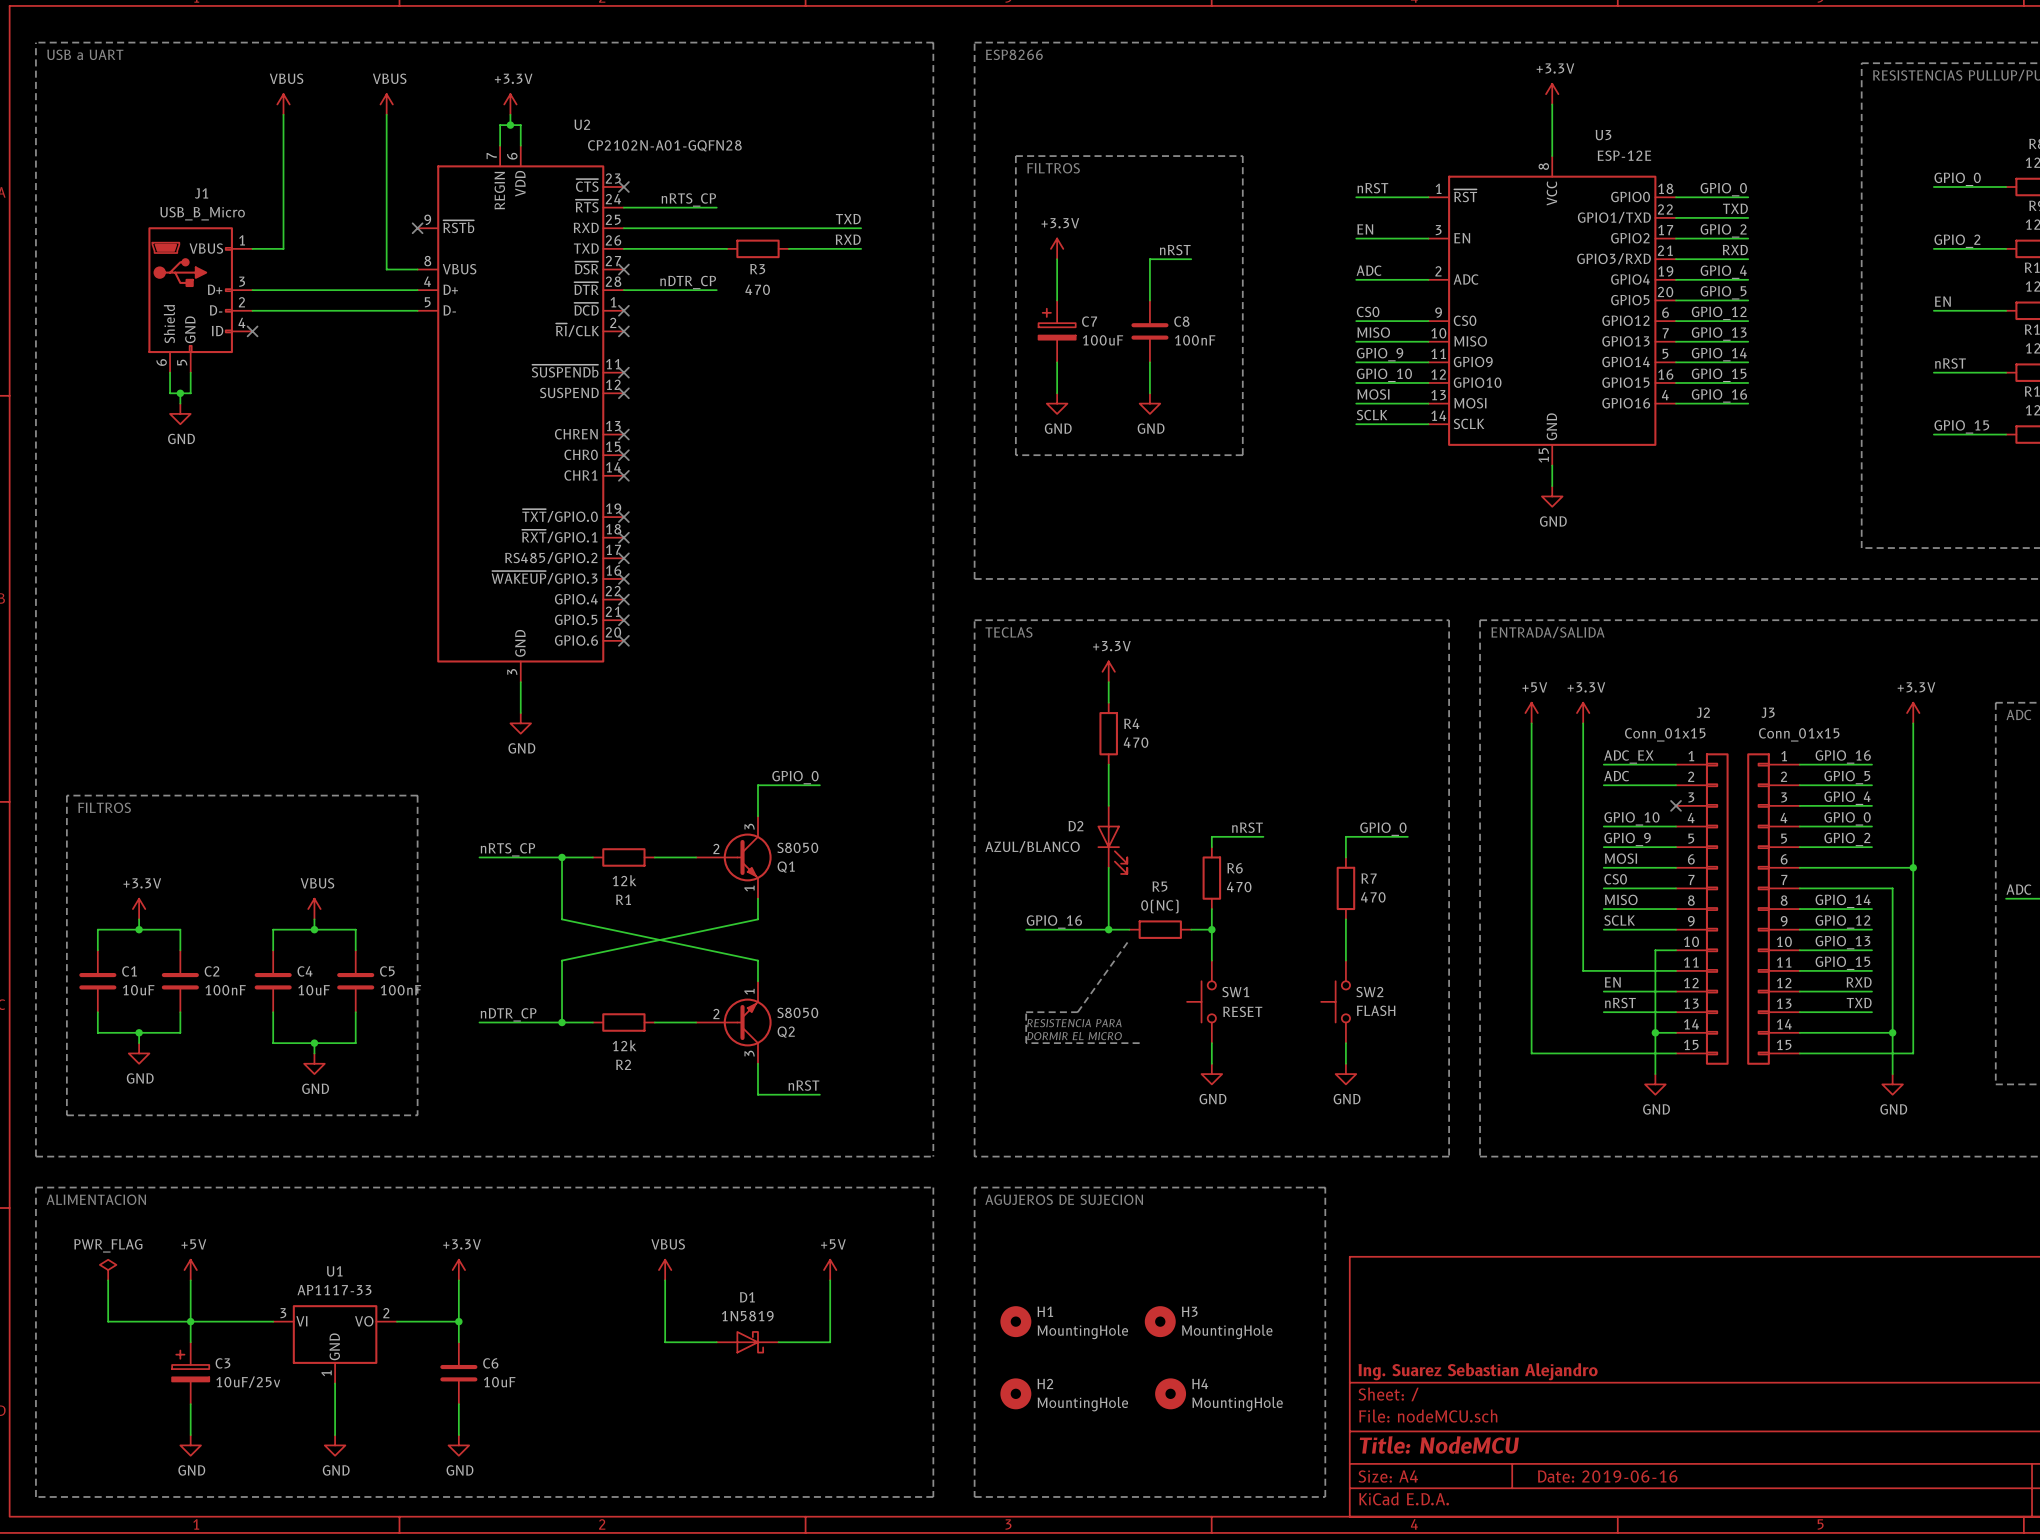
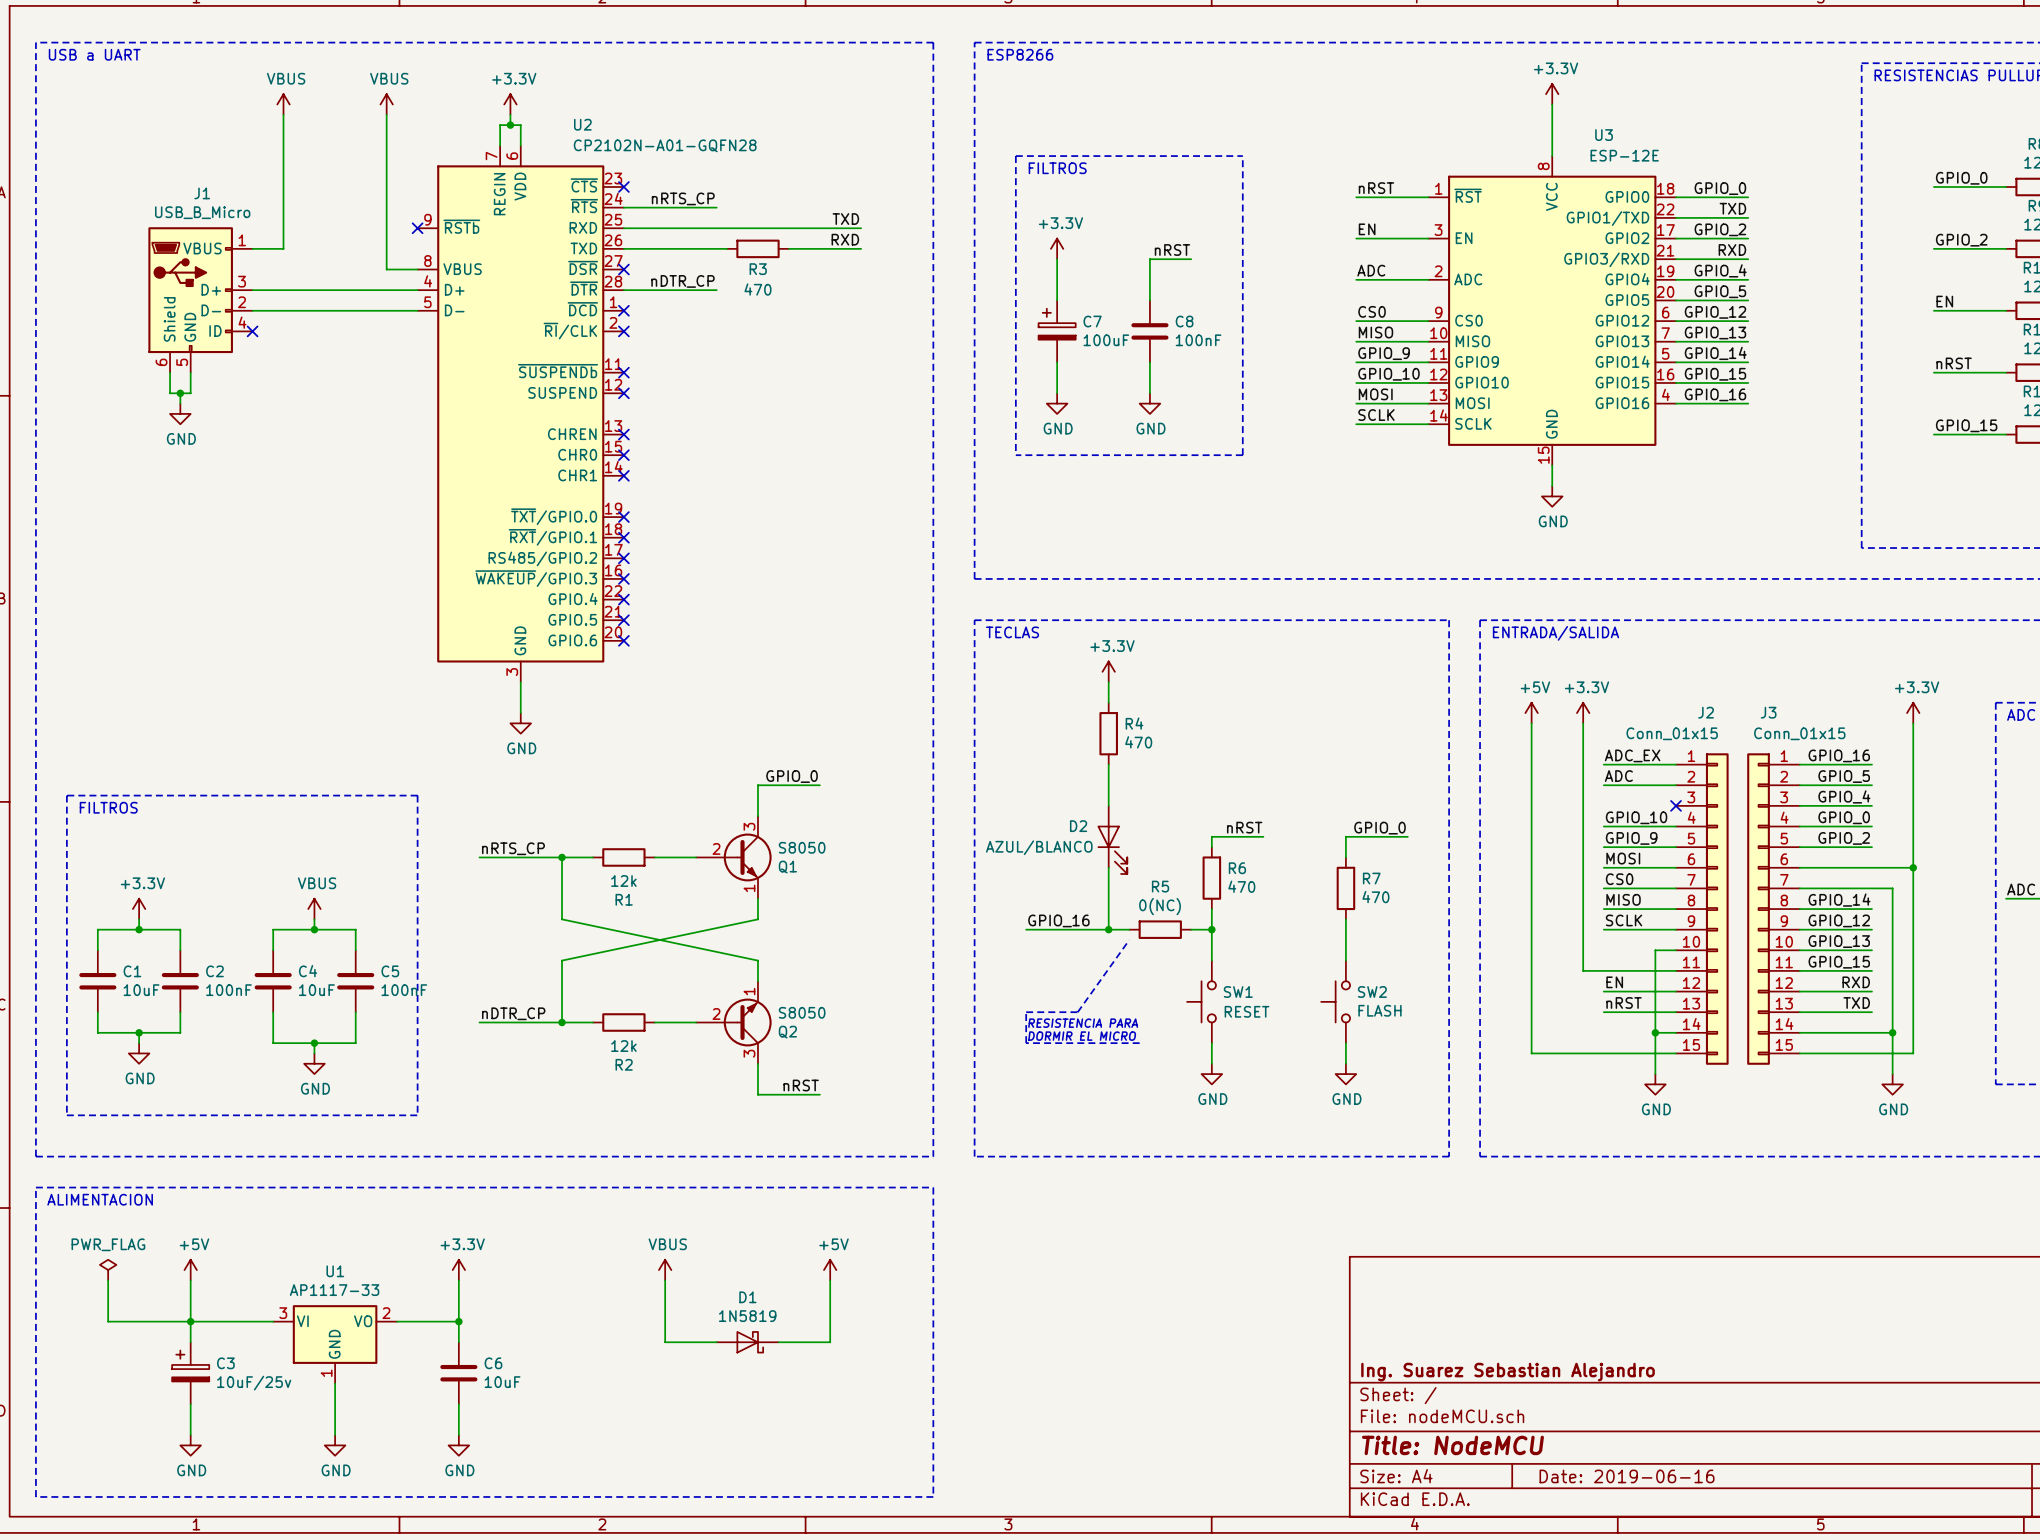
line: (974, 1187) (974, 1496) (1325, 1496) (1325, 1187) (974, 1187) -> none
text: AGUJEROS DE SUJECION (1064, 1199) -> none
H1: MountingHole (1015, 1321) -> none
H3: MountingHole (1160, 1321) -> none
H2: MountingHole (1015, 1393) -> none
H4: MountingHole (1170, 1393) -> none

